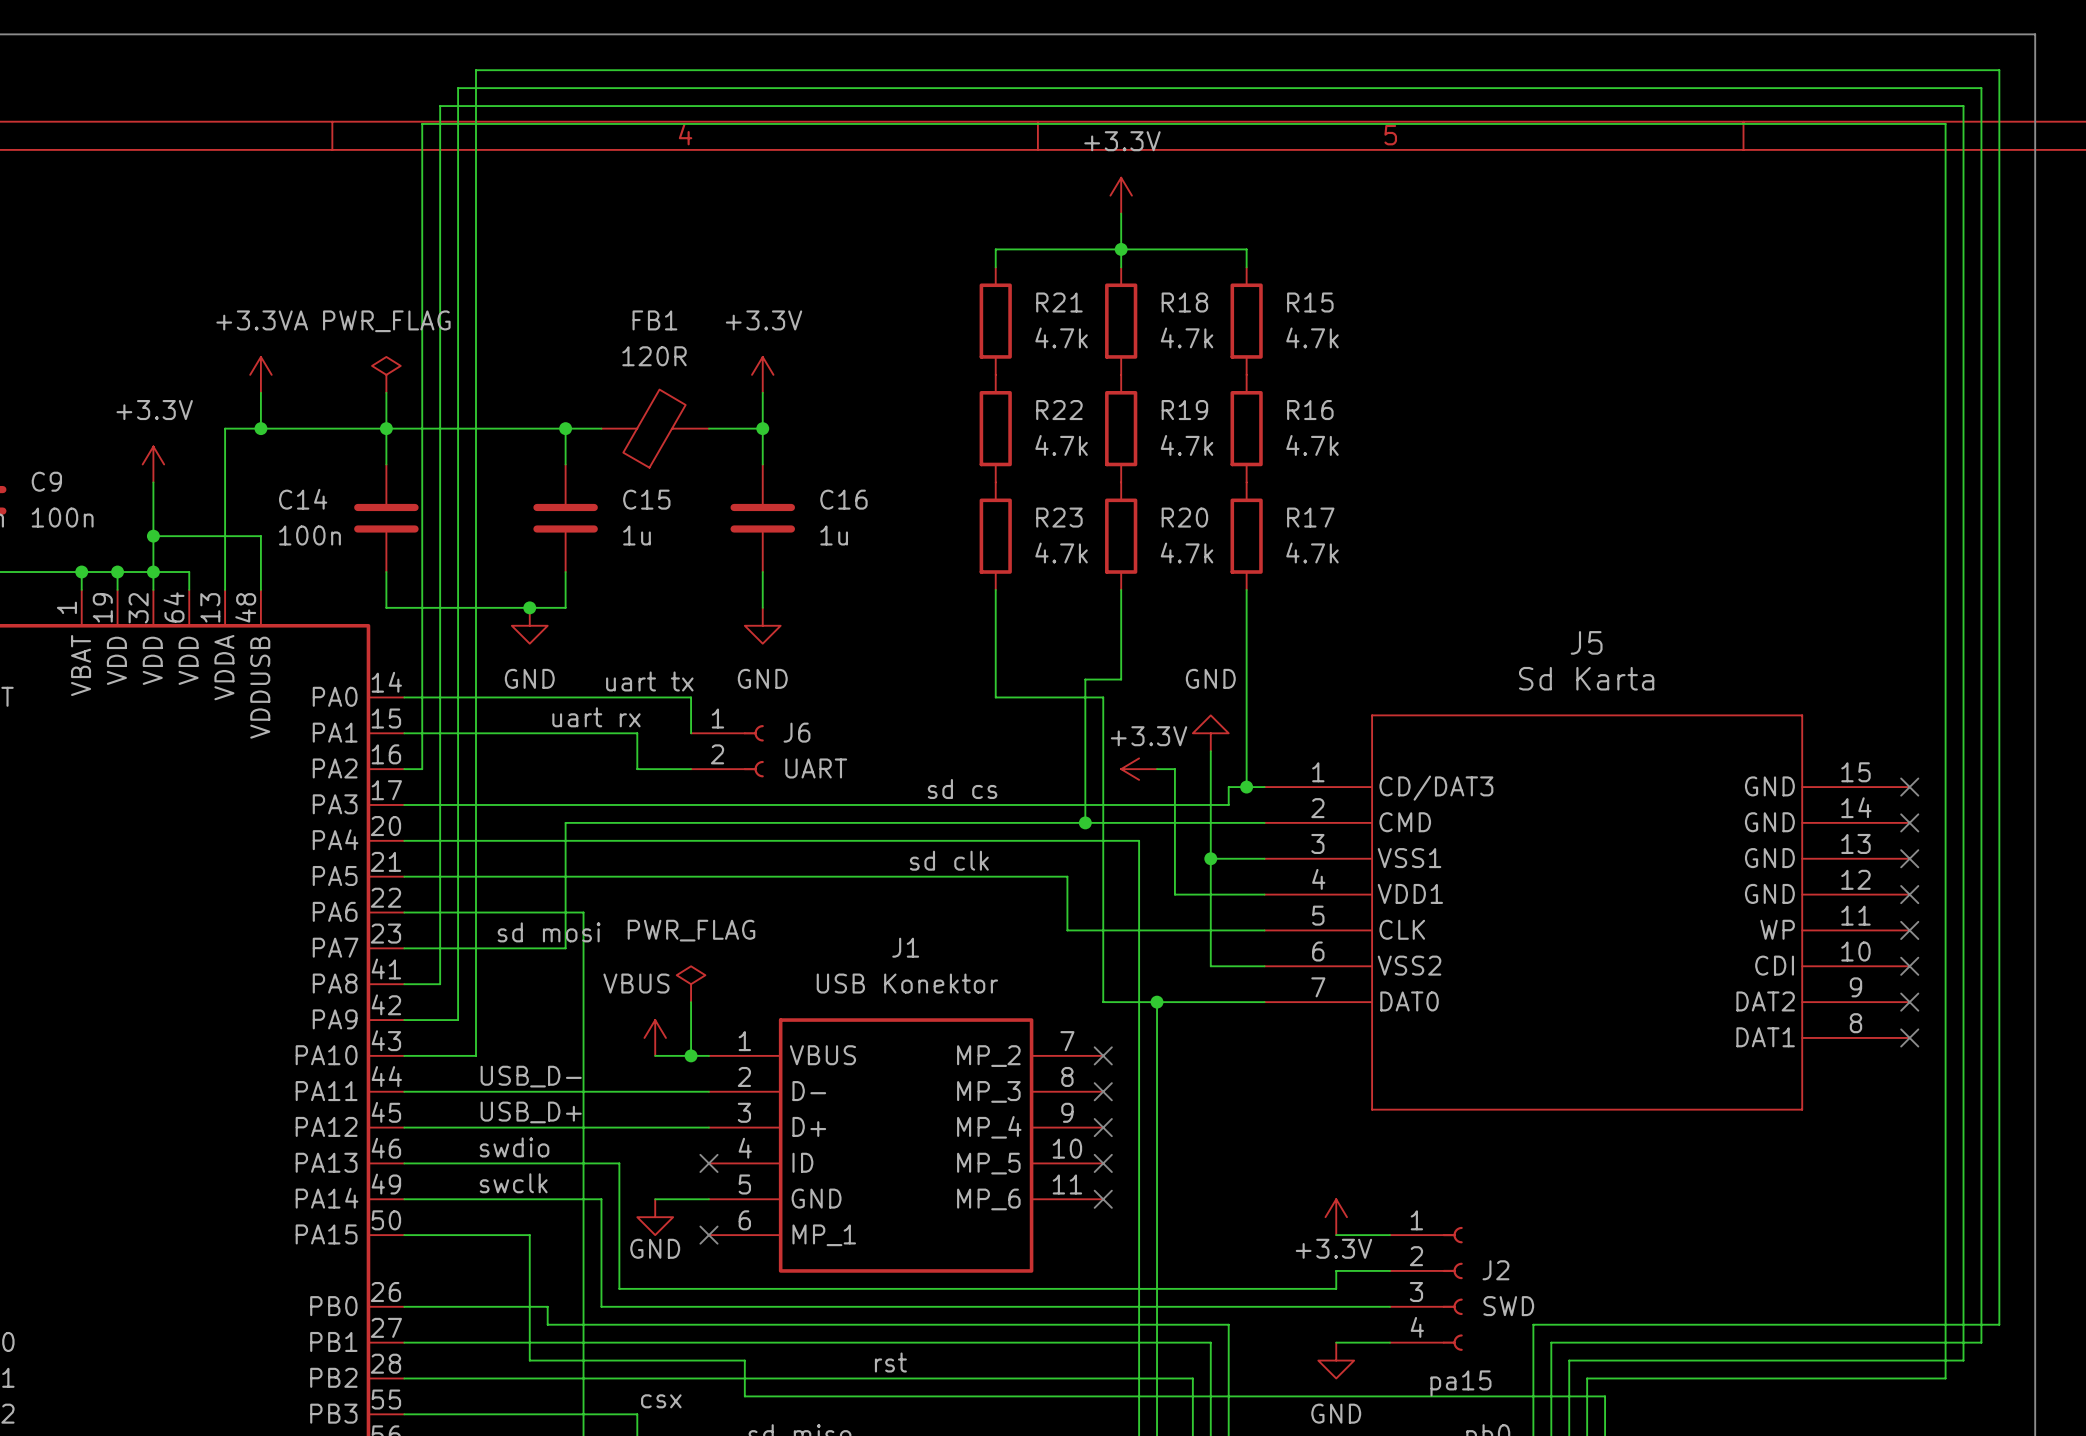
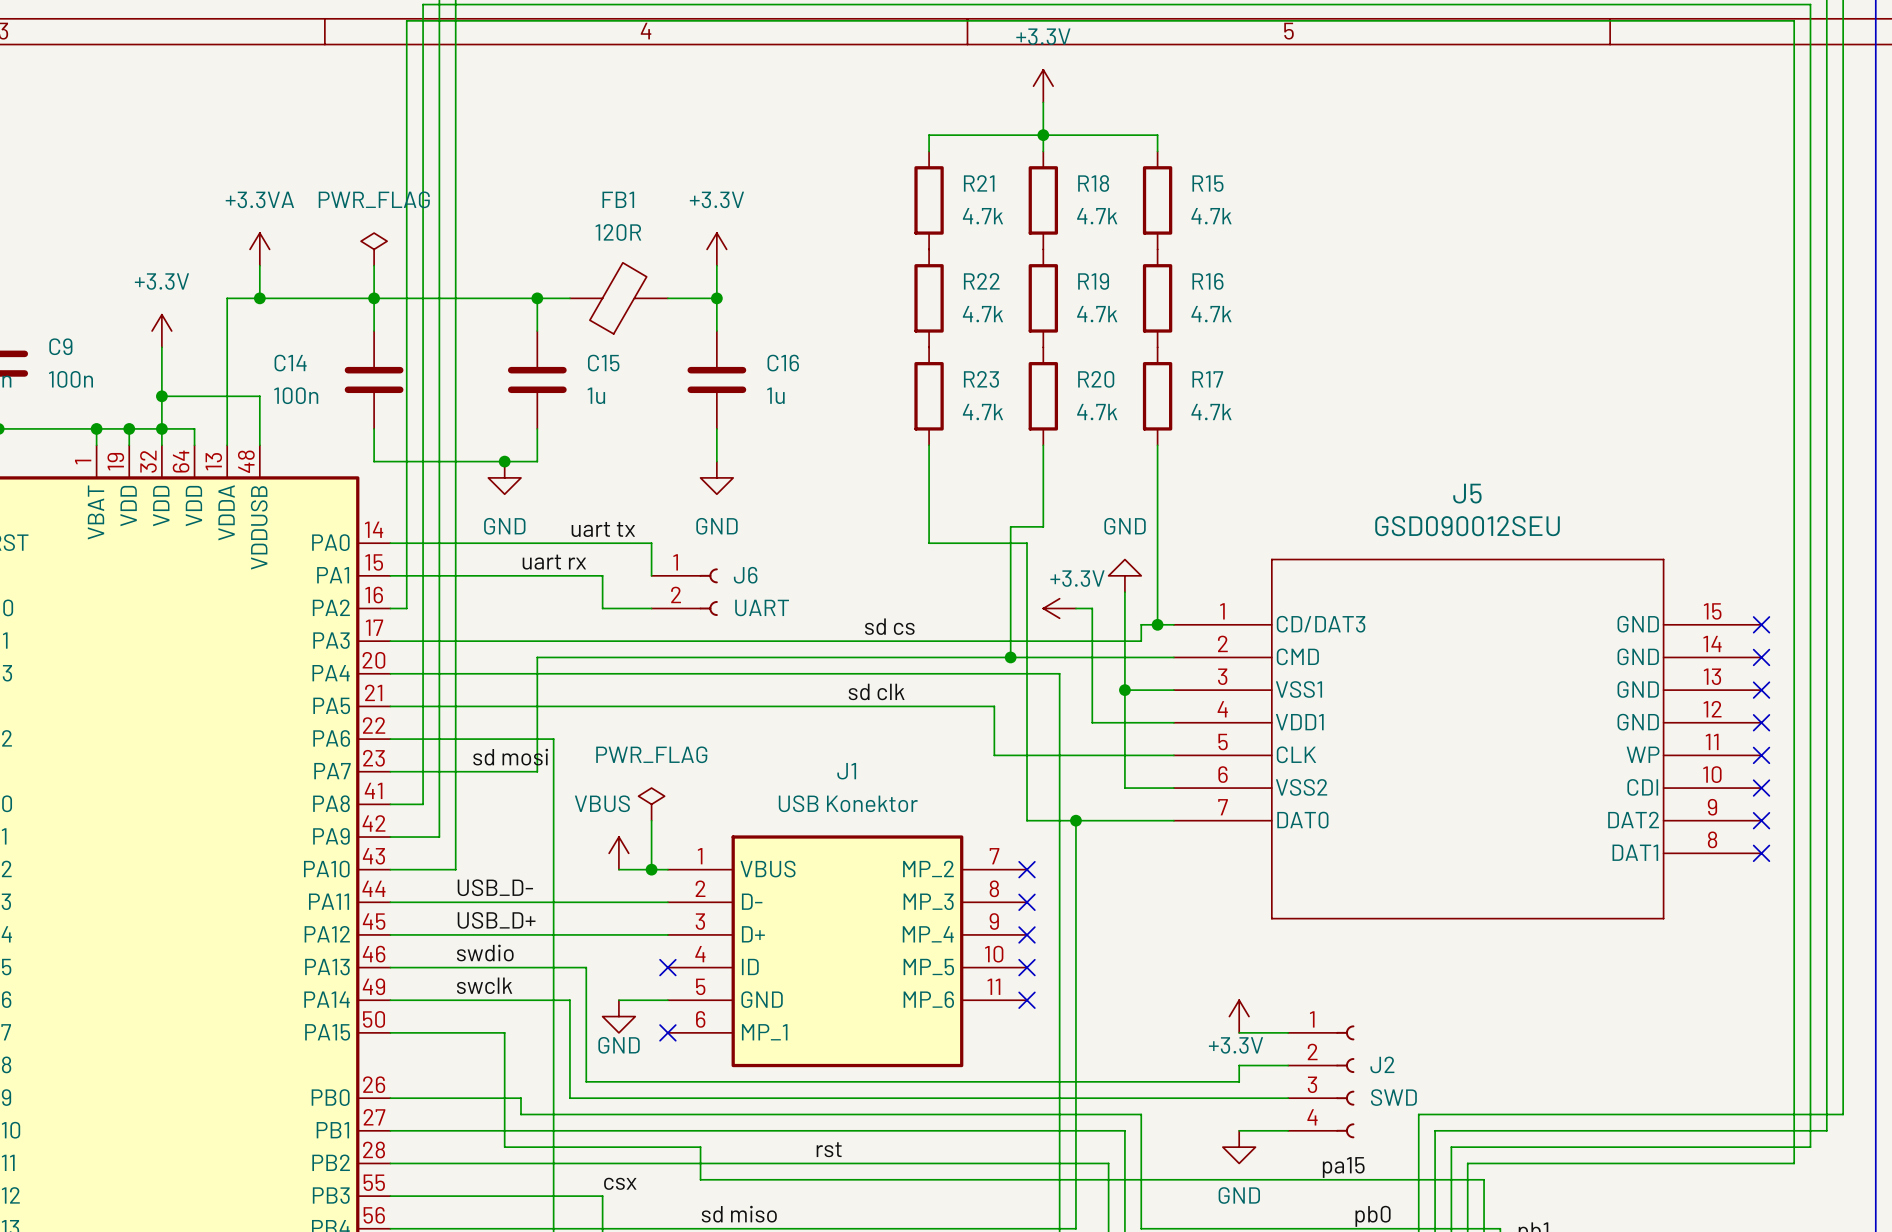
J5 value: Sd Karta (1586, 678) -> GSD090012SEU (1467, 526)

